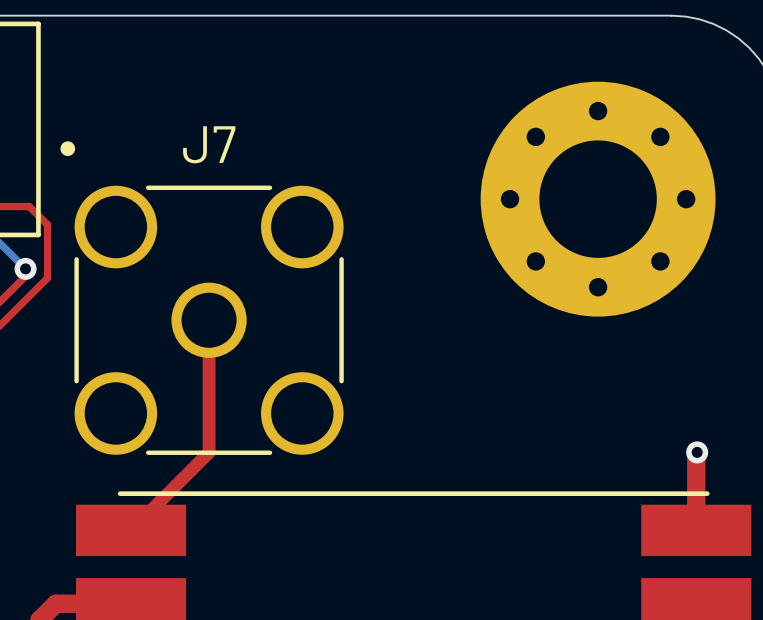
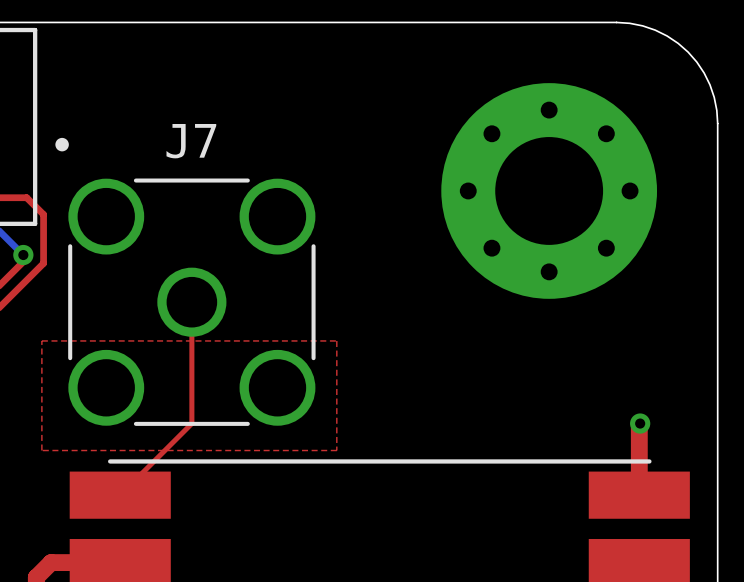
top track width: thick (209, 320) (209, 452) (131, 530) -> thin (191, 302) (191, 423) (120, 495)
top zone outline: none -> (41, 340) (336, 340) (336, 450) (41, 450) (41, 340)

